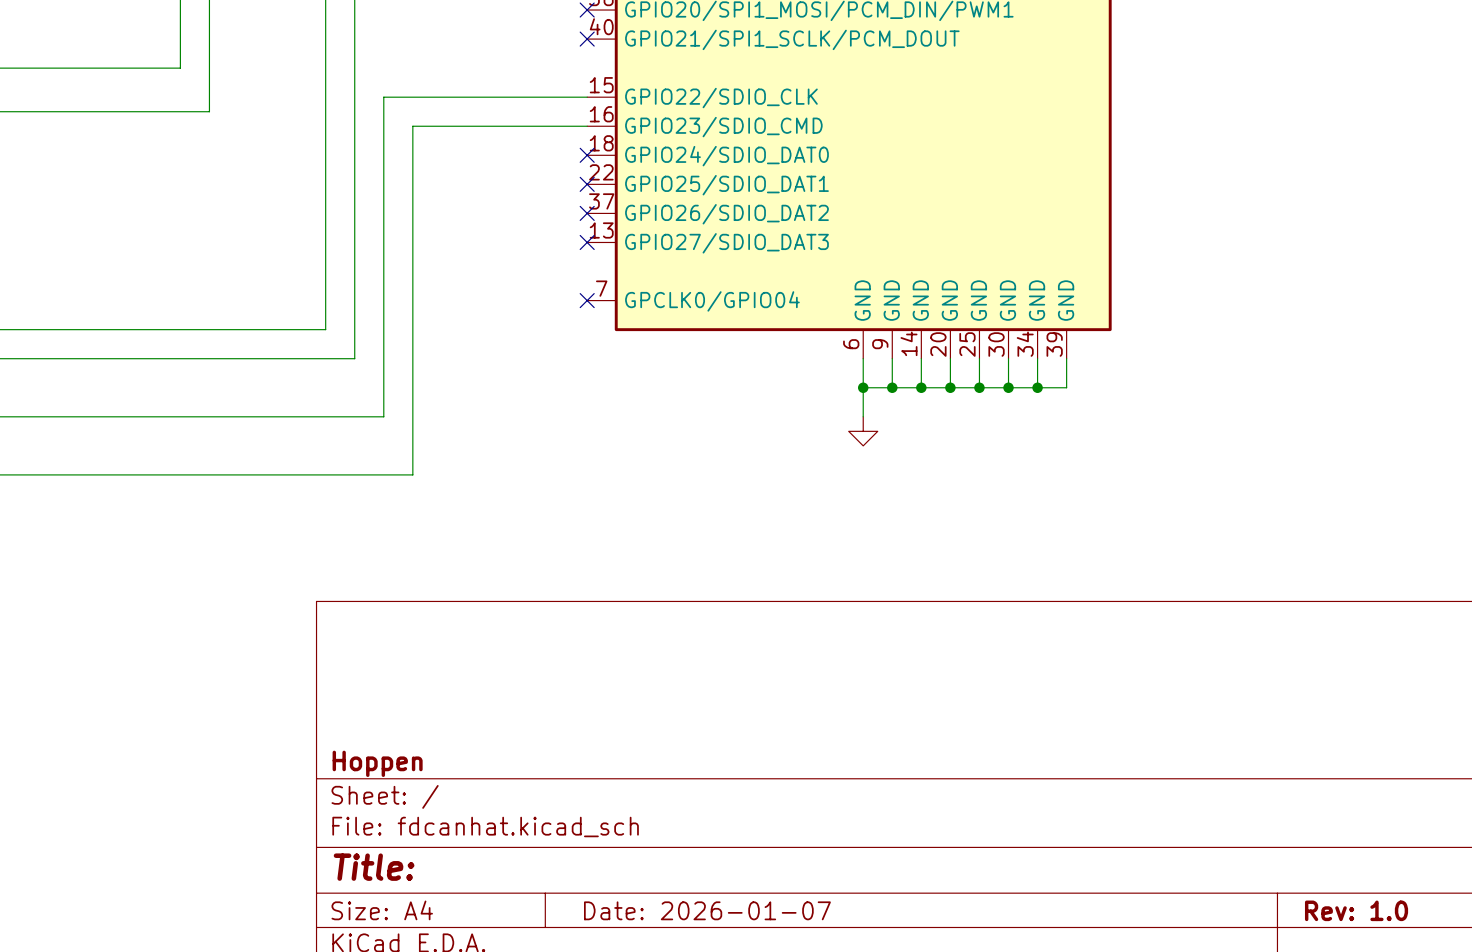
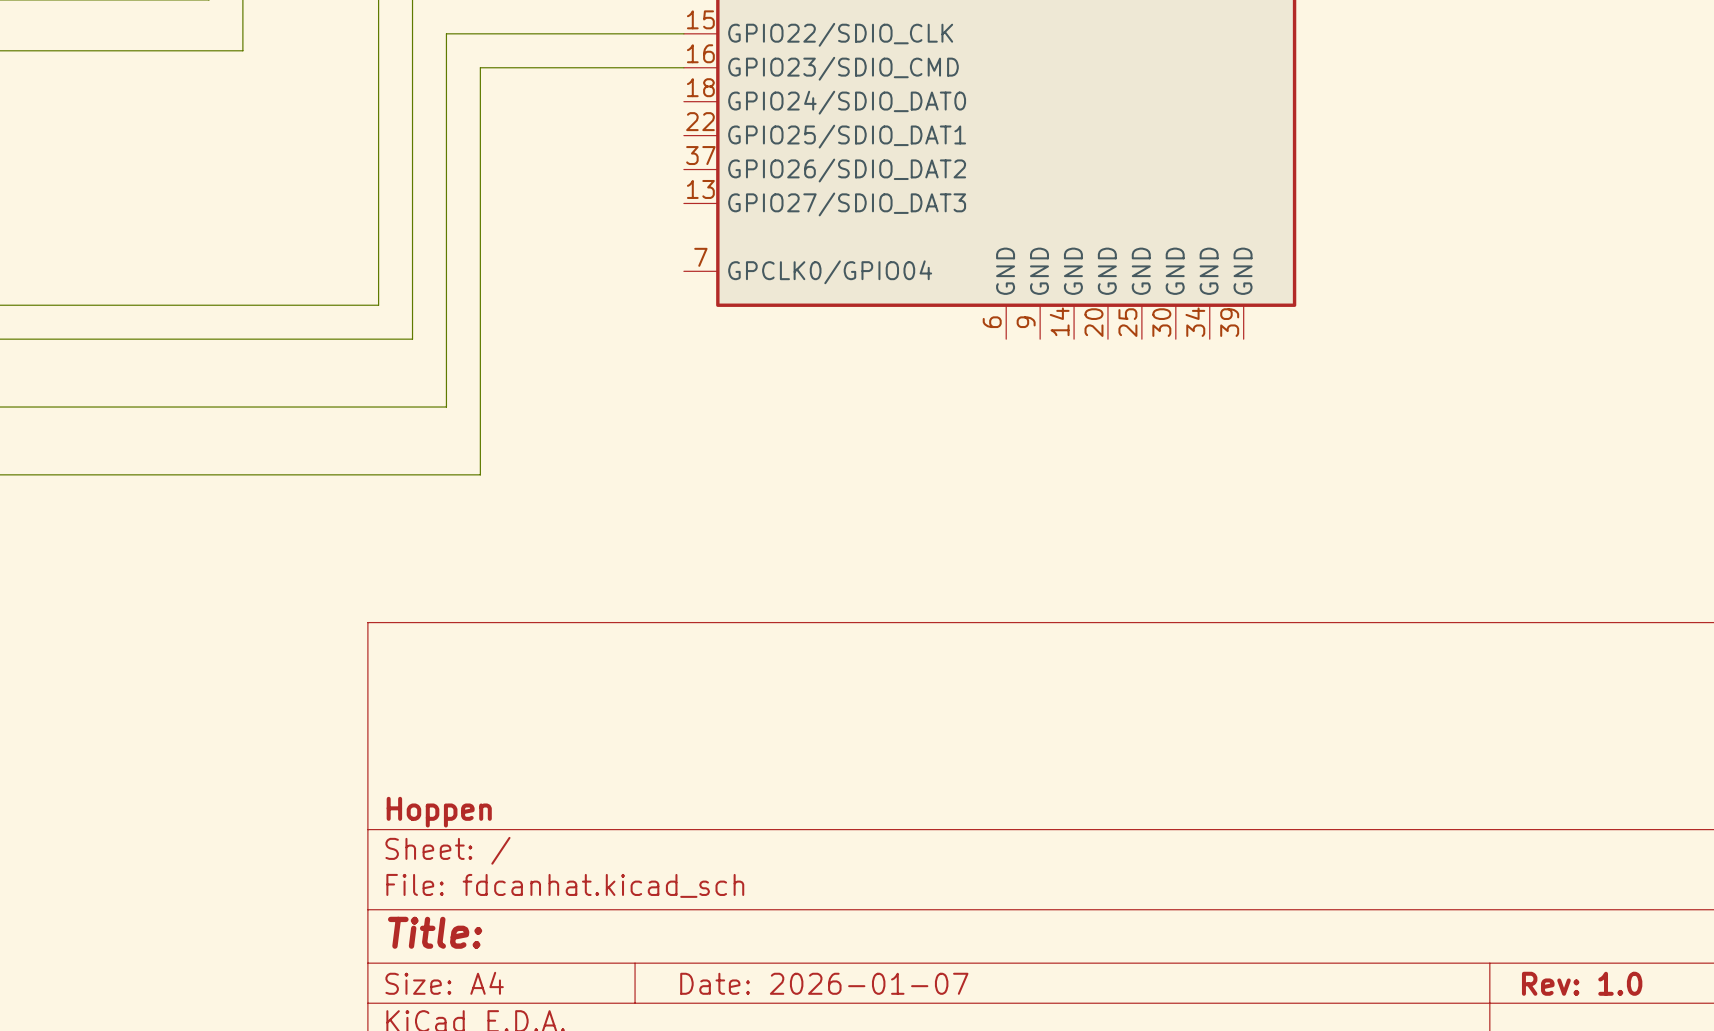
no-connect mark: (587, 155) -> none
no-connect mark: (587, 184) -> none
no-connect mark: (587, 213) -> none
no-connect mark: (587, 242) -> none
no-connect mark: (587, 300) -> none
wire: (863, 358) (863, 416) -> none
wire: (892, 358) (892, 387) -> none
wire: (921, 358) (921, 387) -> none
wire: (950, 358) (950, 387) -> none
wire: (979, 358) (979, 387) -> none
wire: (1008, 358) (1008, 387) -> none
wire: (1037, 358) (1037, 387) -> none
wire: (1066, 358) (1066, 387) (863, 387) -> none
junction: (863, 387) -> none
junction: (892, 387) -> none
junction: (921, 387) -> none
junction: (950, 387) -> none
junction: (979, 387) -> none
junction: (1008, 387) -> none
junction: (1037, 387) -> none
power symbol: (863, 431) -> none

